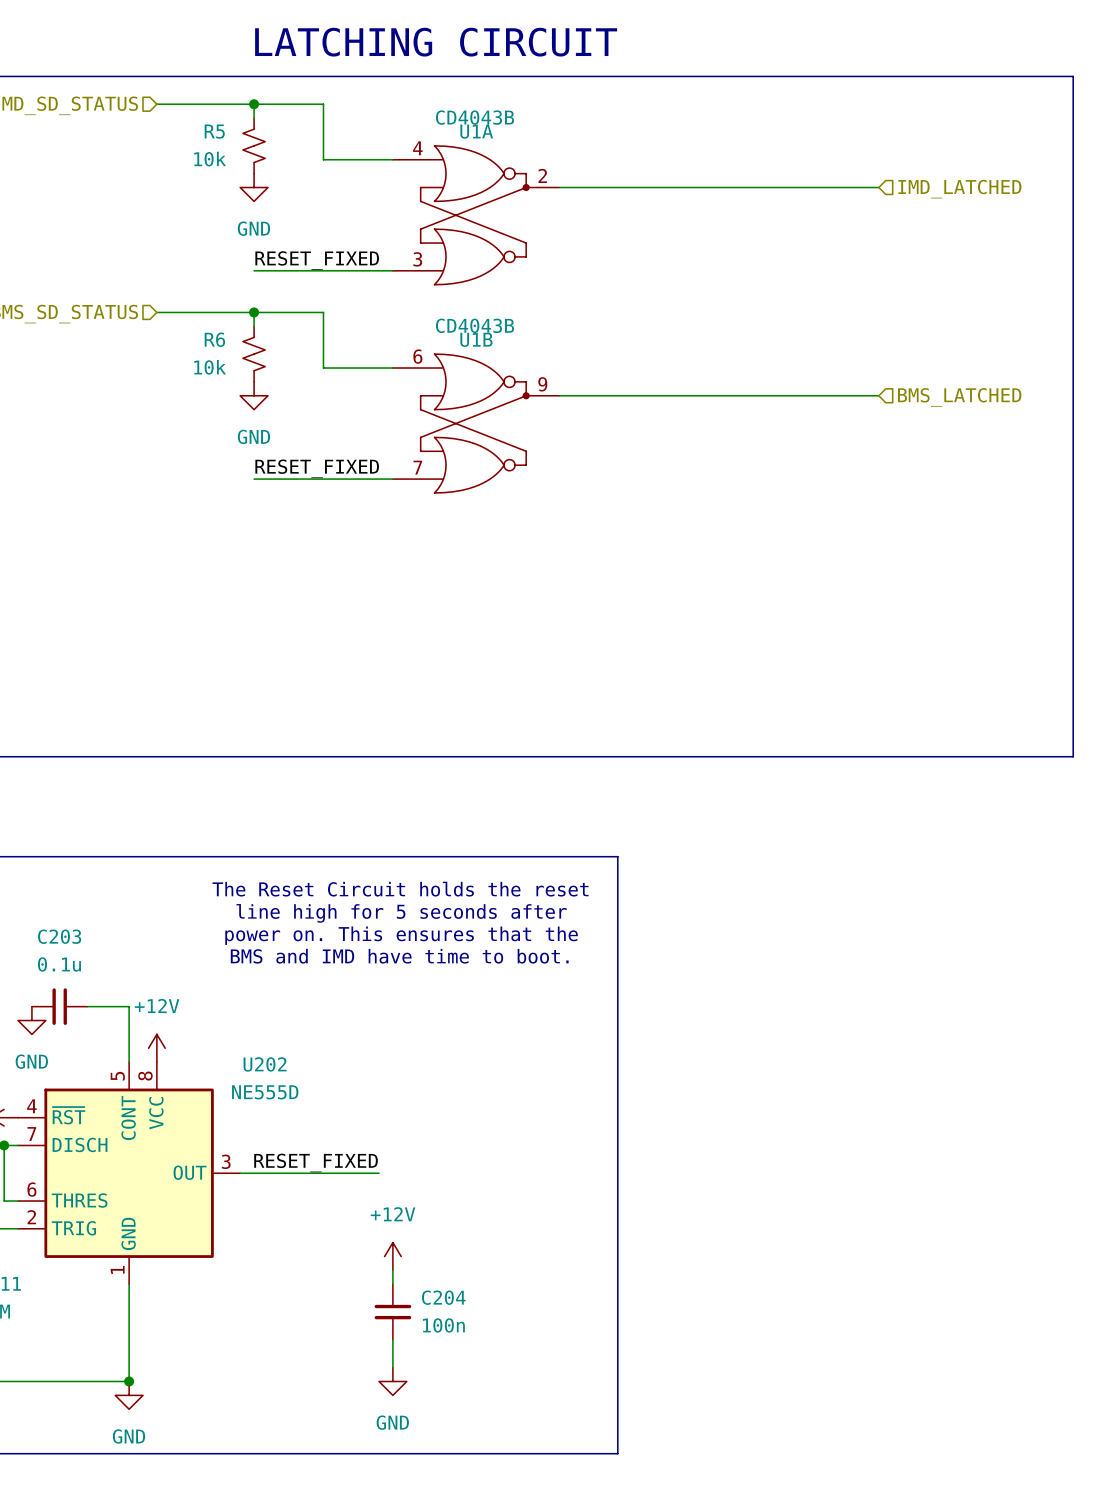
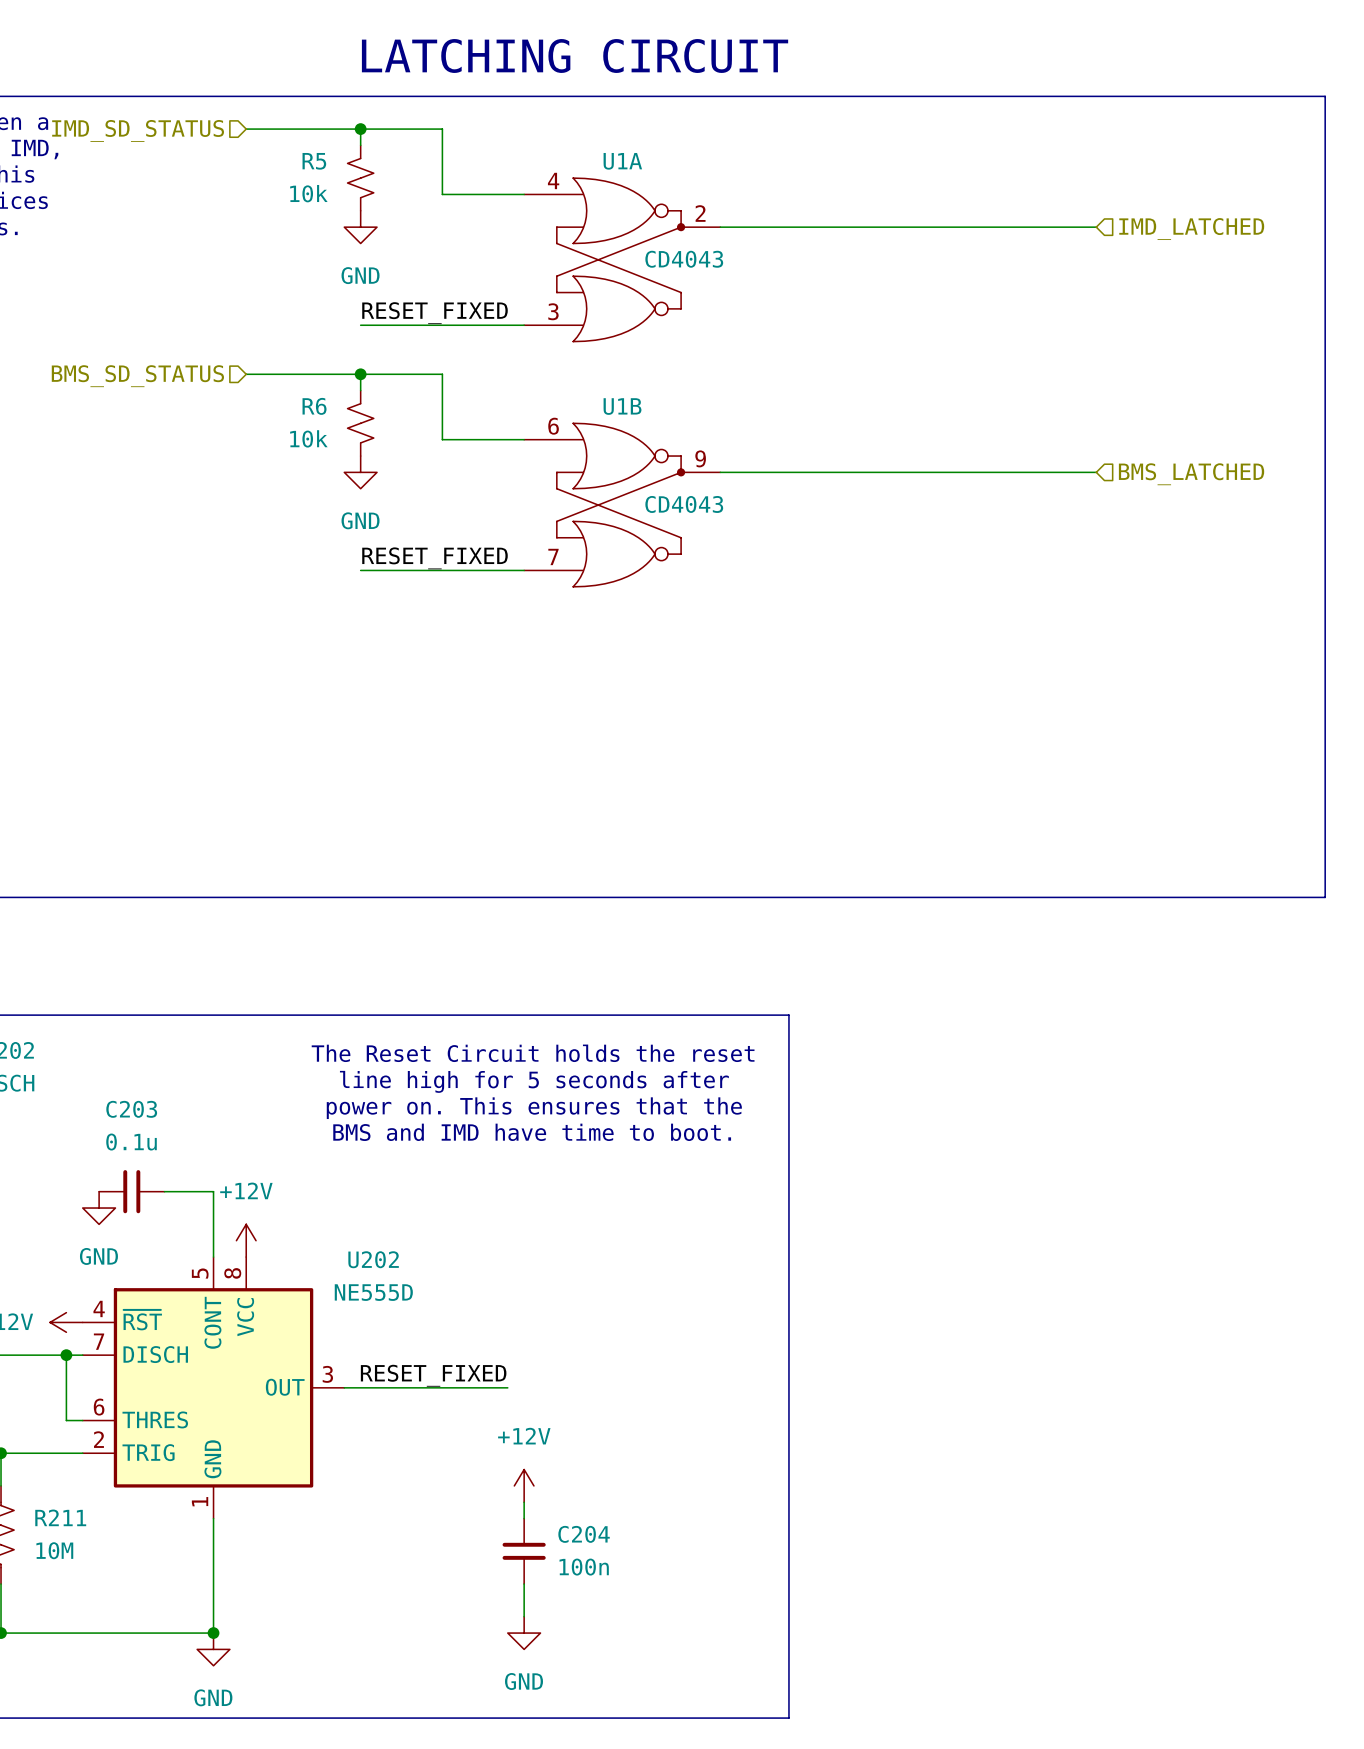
U1A value: CD4043B (475, 117) -> CD4043 (684, 259)
U1B value: CD4043B (475, 325) -> CD4043 (684, 504)

